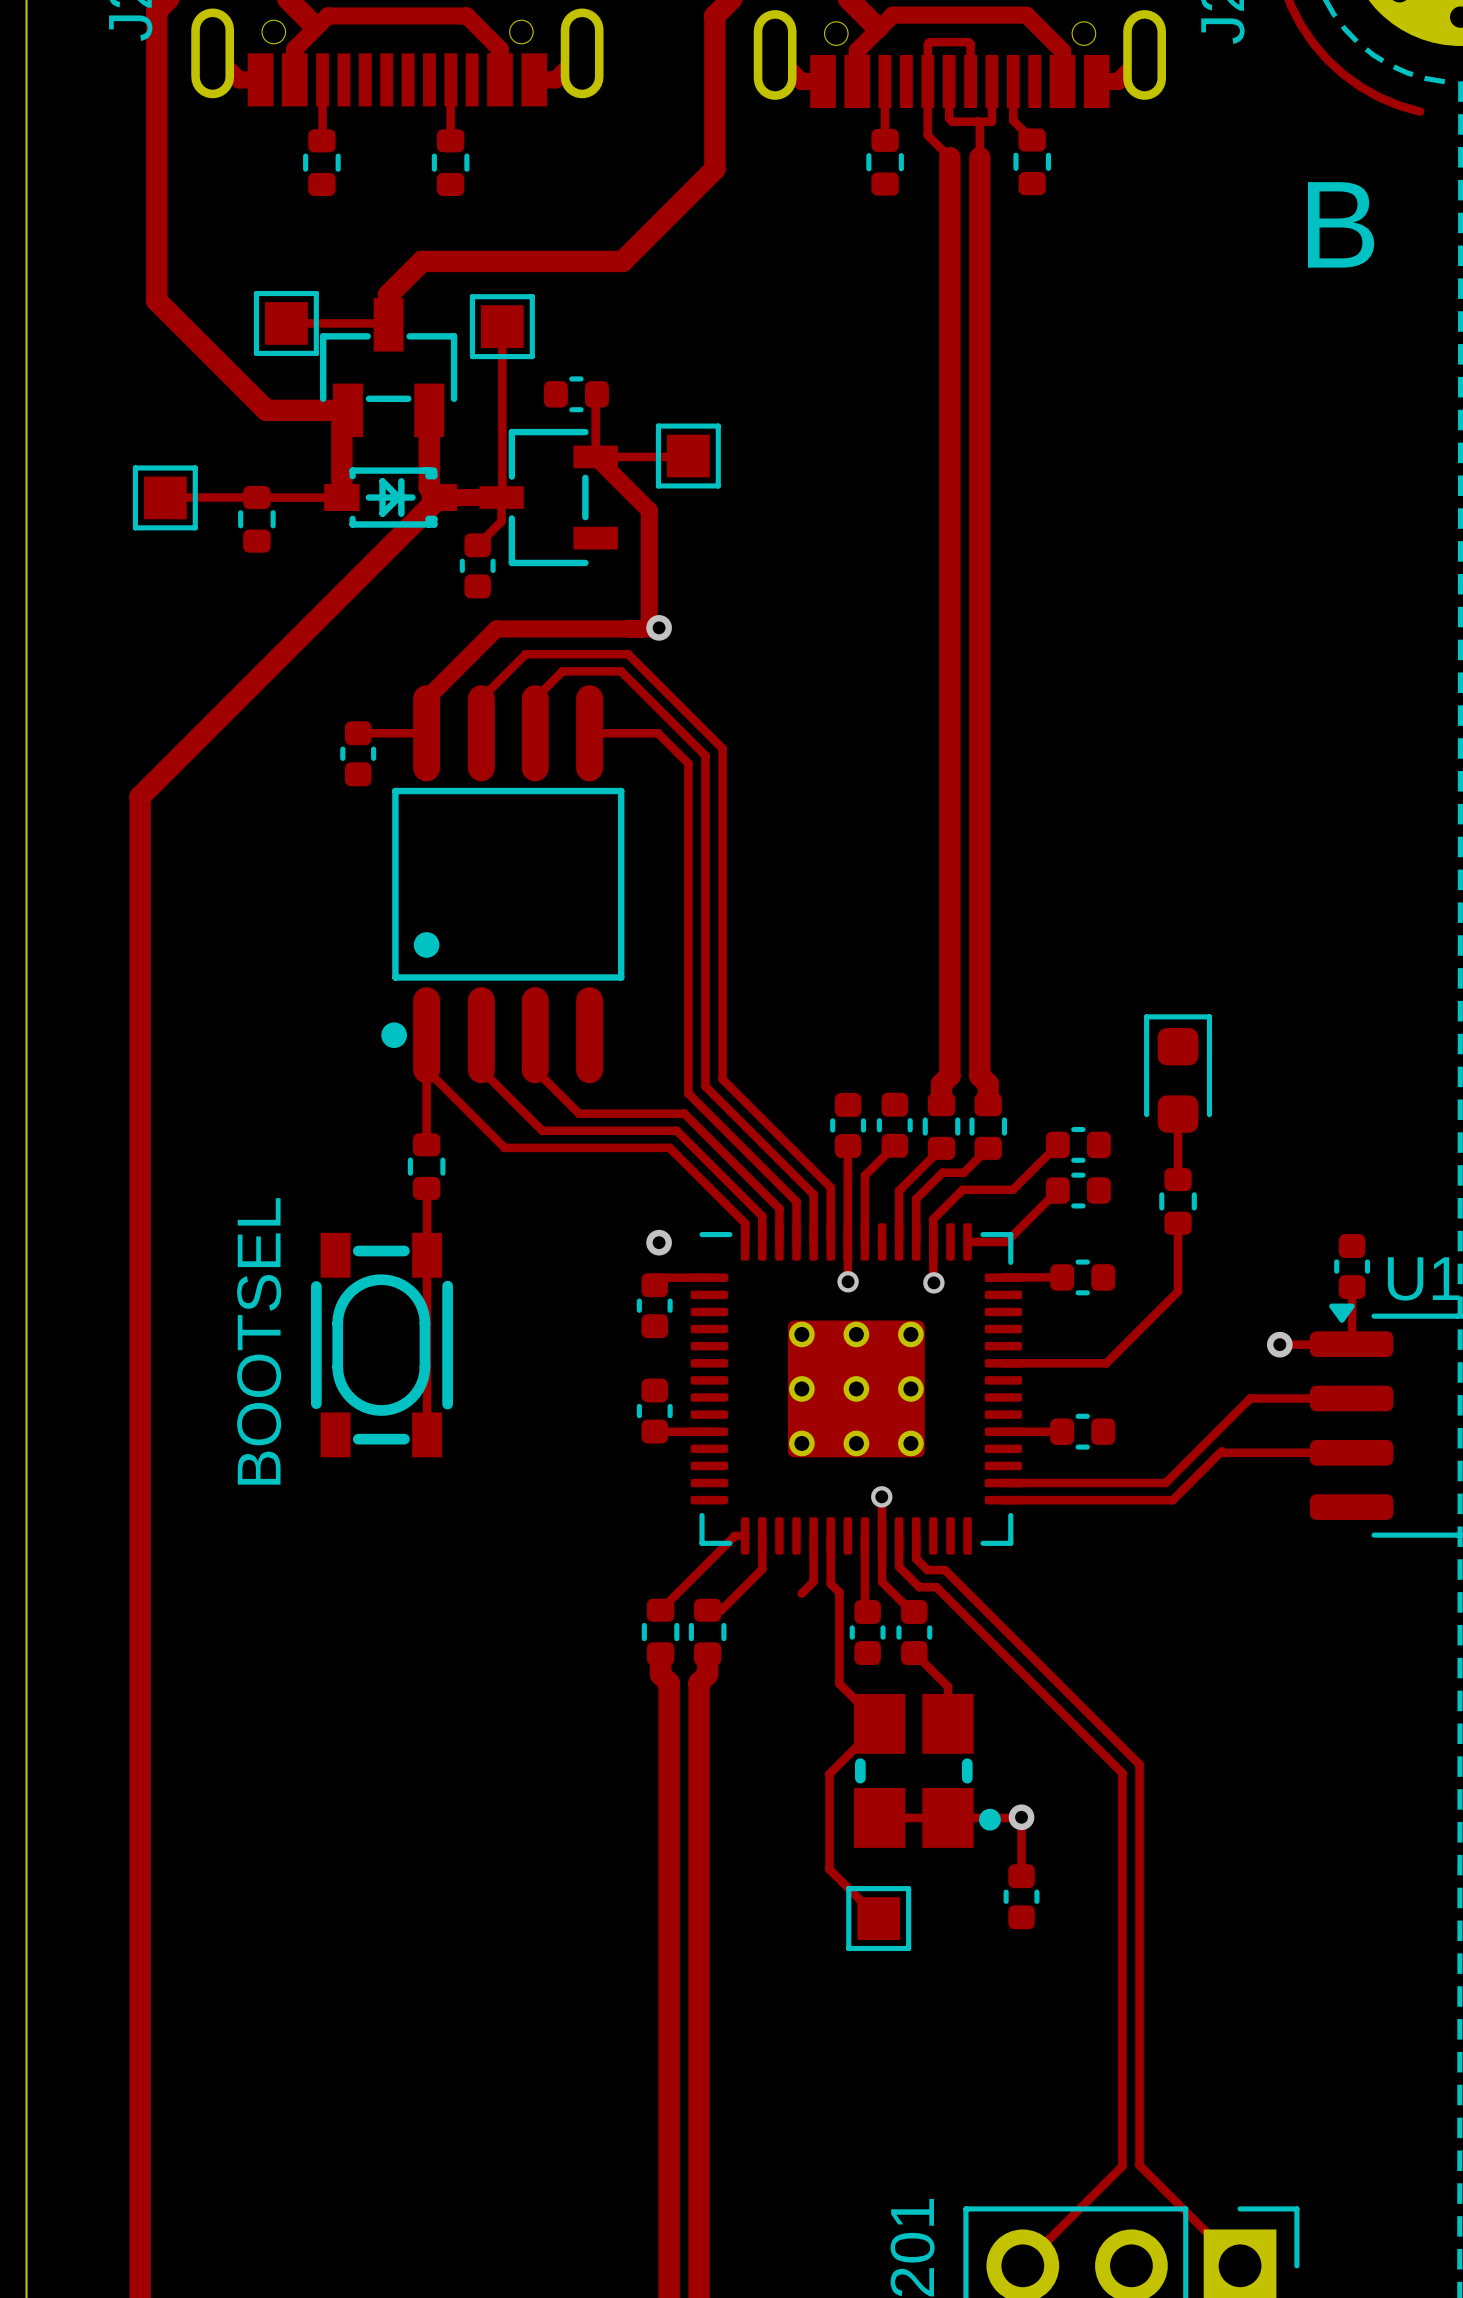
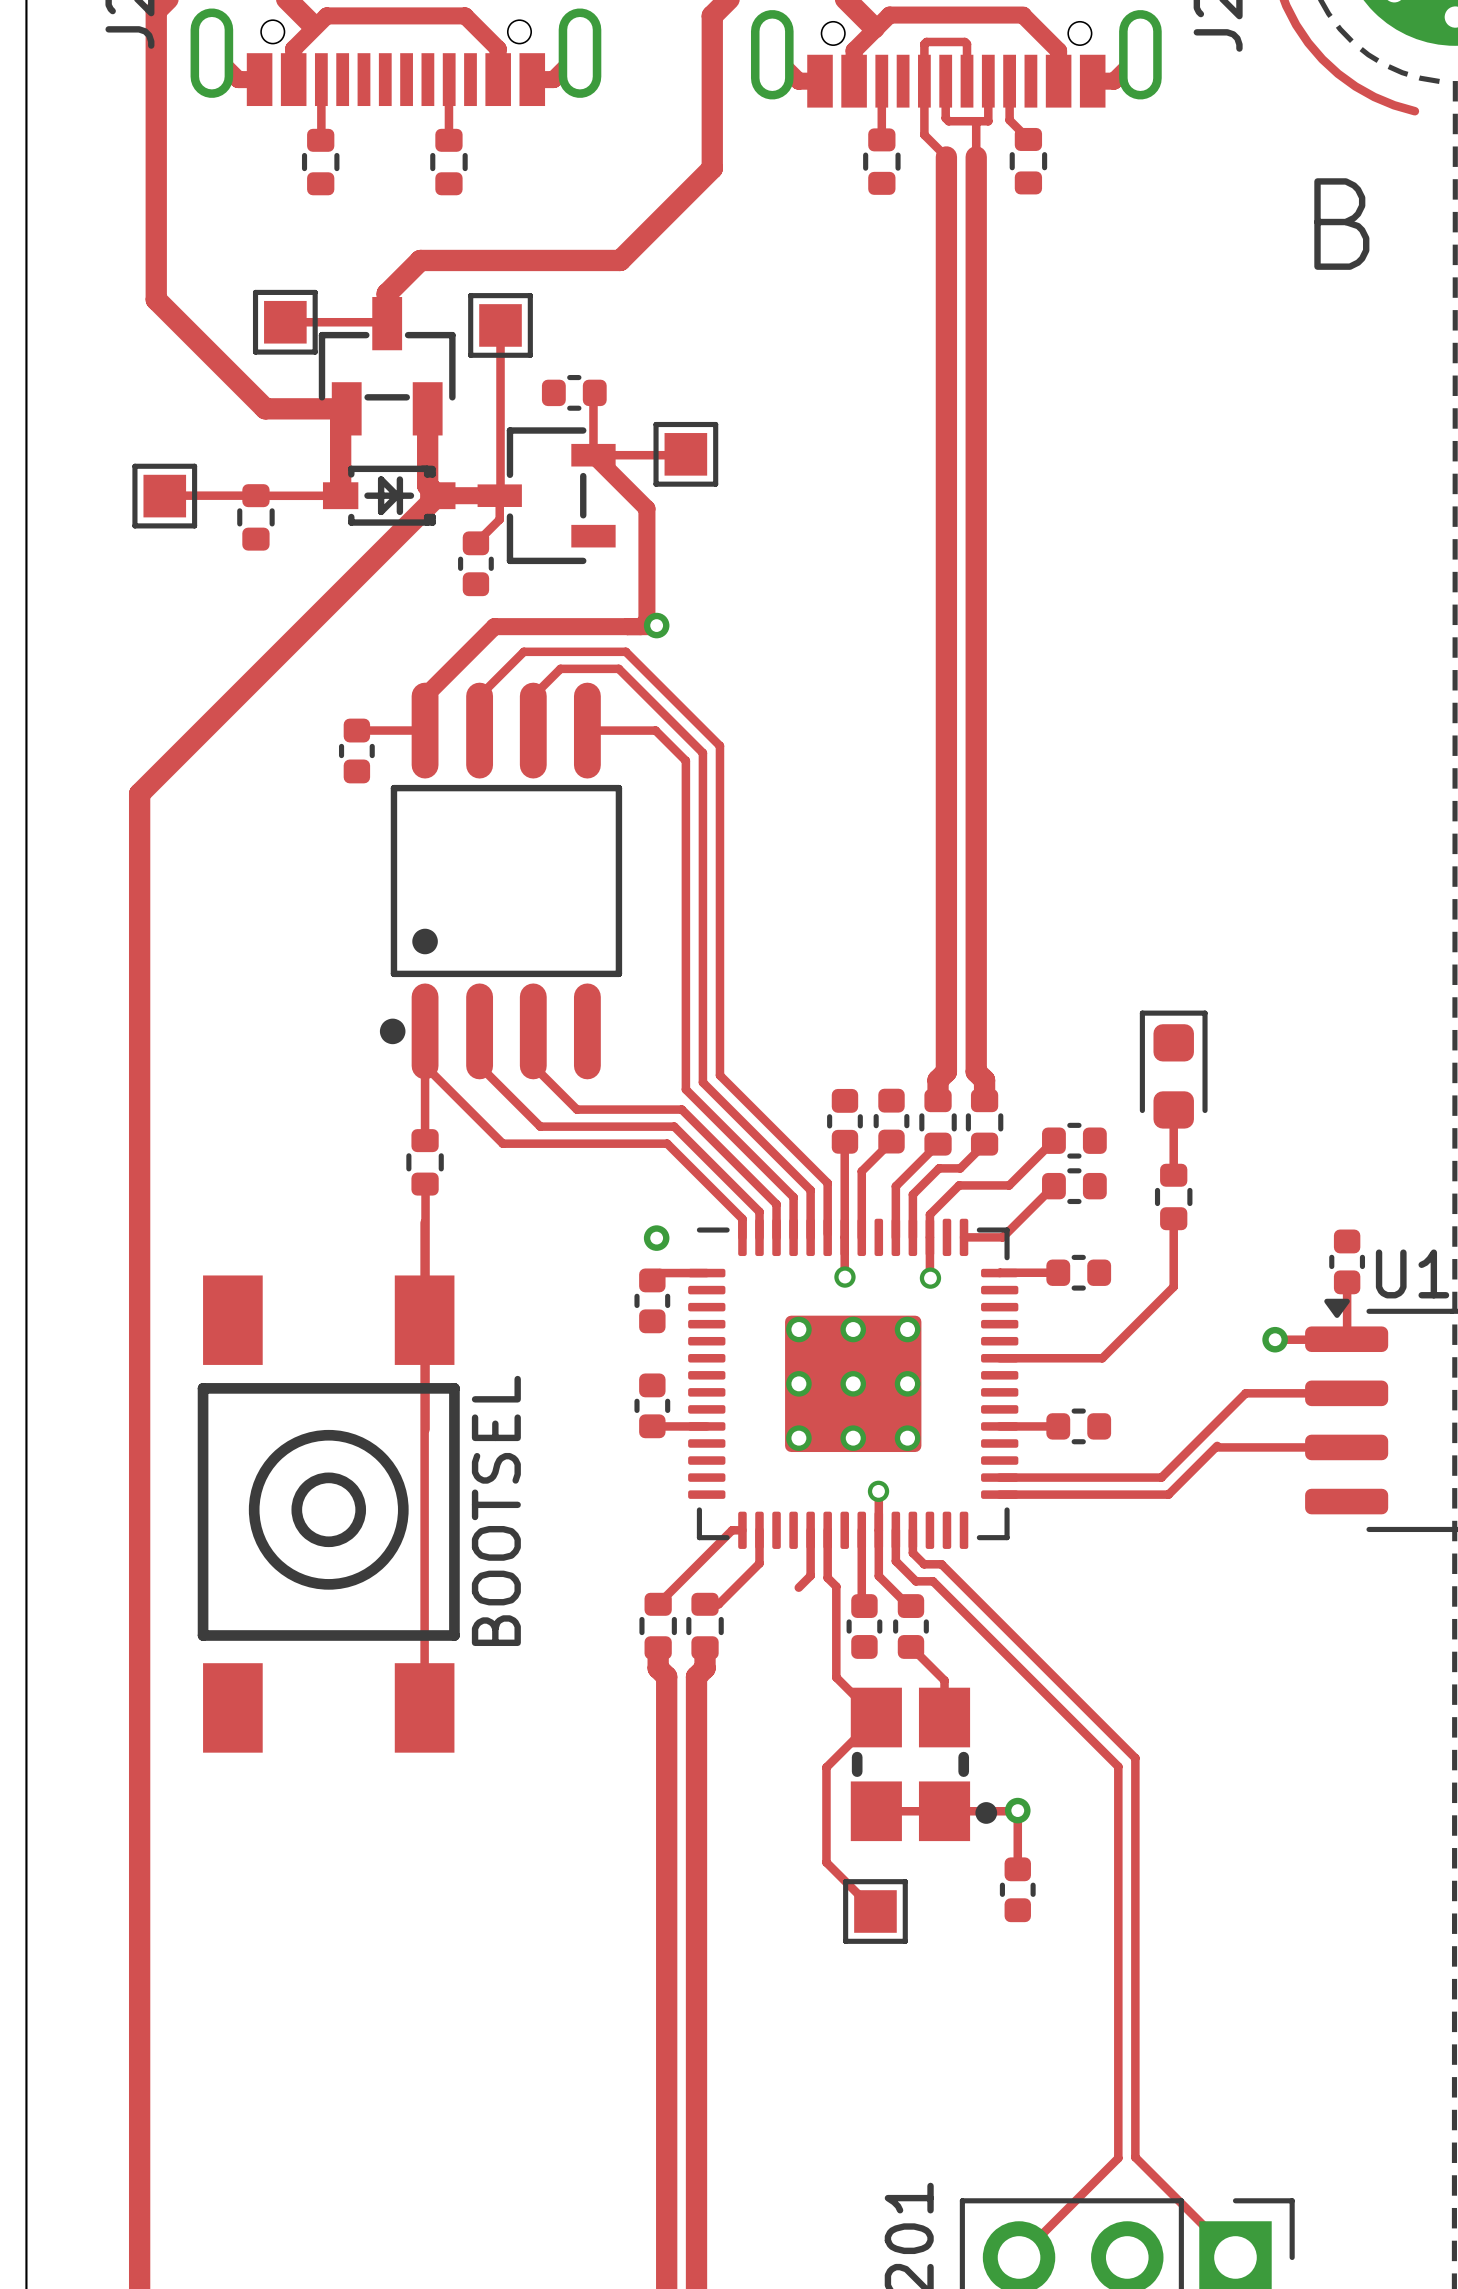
track: none -> (424, 1222) (424, 1707)
part: BOOTSEL (381, 1345) -> none
part: none -> BOOTSEL (328, 1514)

